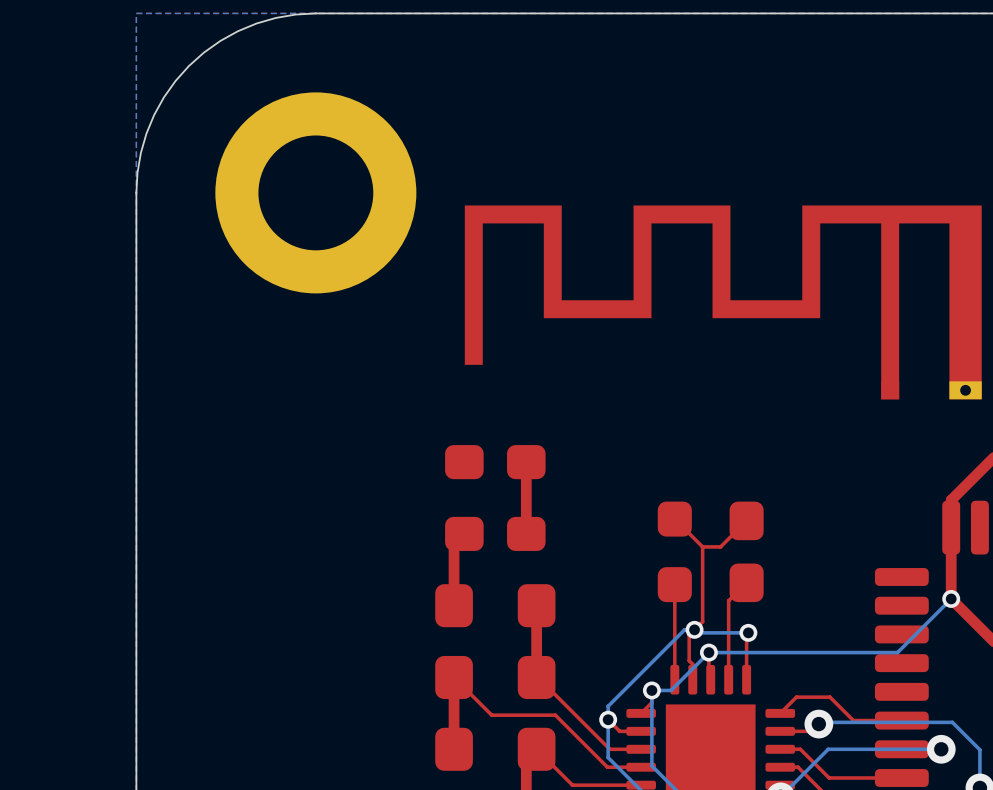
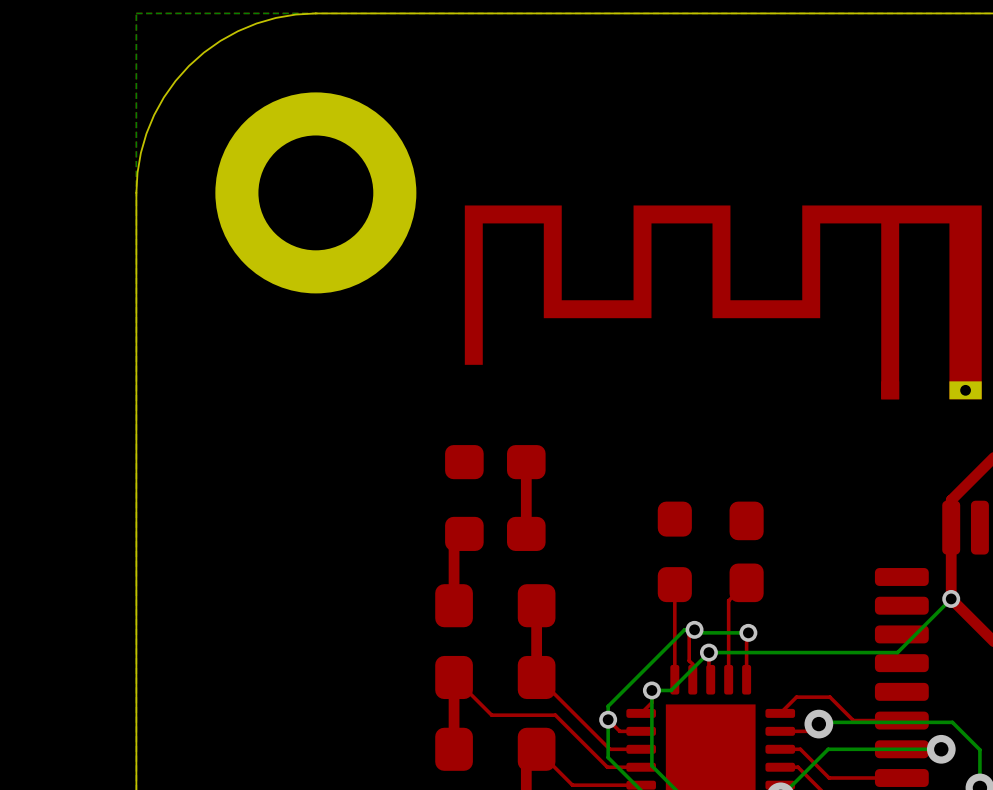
top track: (674, 519) (702, 546) -> none
top track: (746, 520) (720, 546) (702, 546) -> none
top track: (702, 546) (702, 621) (694, 629) -> none

